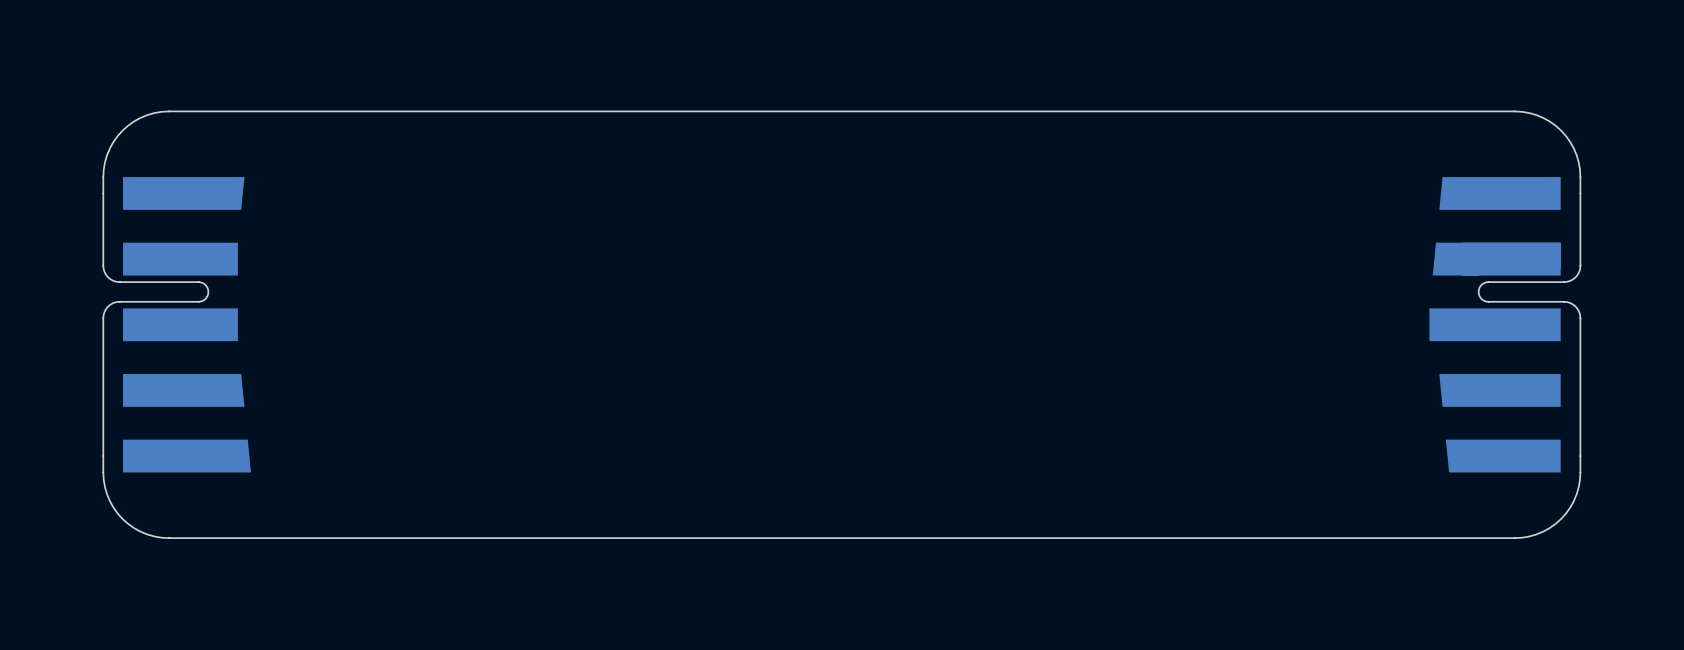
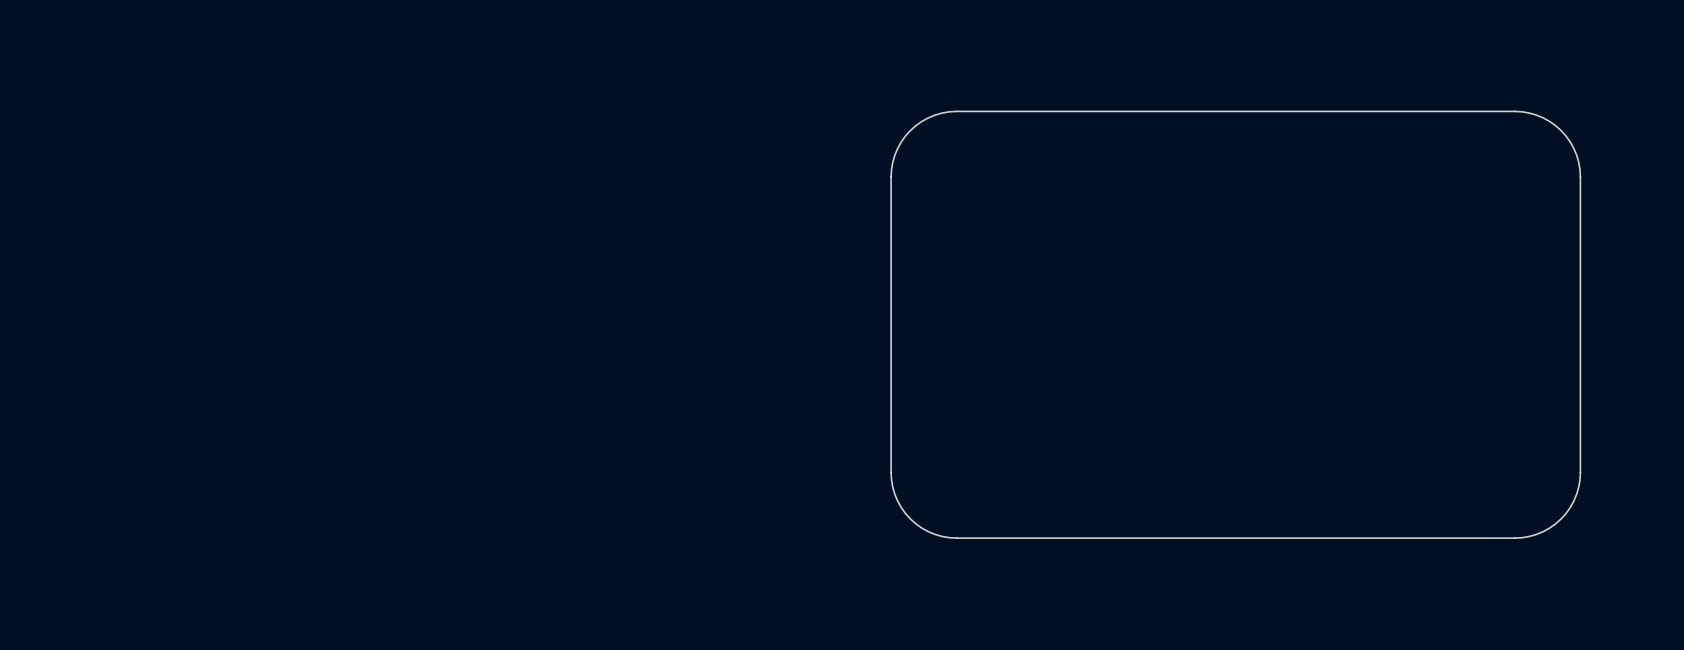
board edge: (956, 111) (161, 111) (147, 115) (134, 121) (117, 136) (109, 148) (104, 162) (103, 193) -> (956, 111) (935, 115) (921, 121) (910, 130) (897, 148) (892, 162) (891, 177) (891, 472) (892, 487) (901, 507) (915, 523) (935, 534) (956, 538)
board edge: none -> (1580, 193) (1580, 456)
part: (176, 324) -> none
part: (1505, 324) -> none
board edge: (103, 456) (104, 487) (109, 500) (117, 513) (134, 528) (147, 534) (161, 537) (956, 538) -> none

